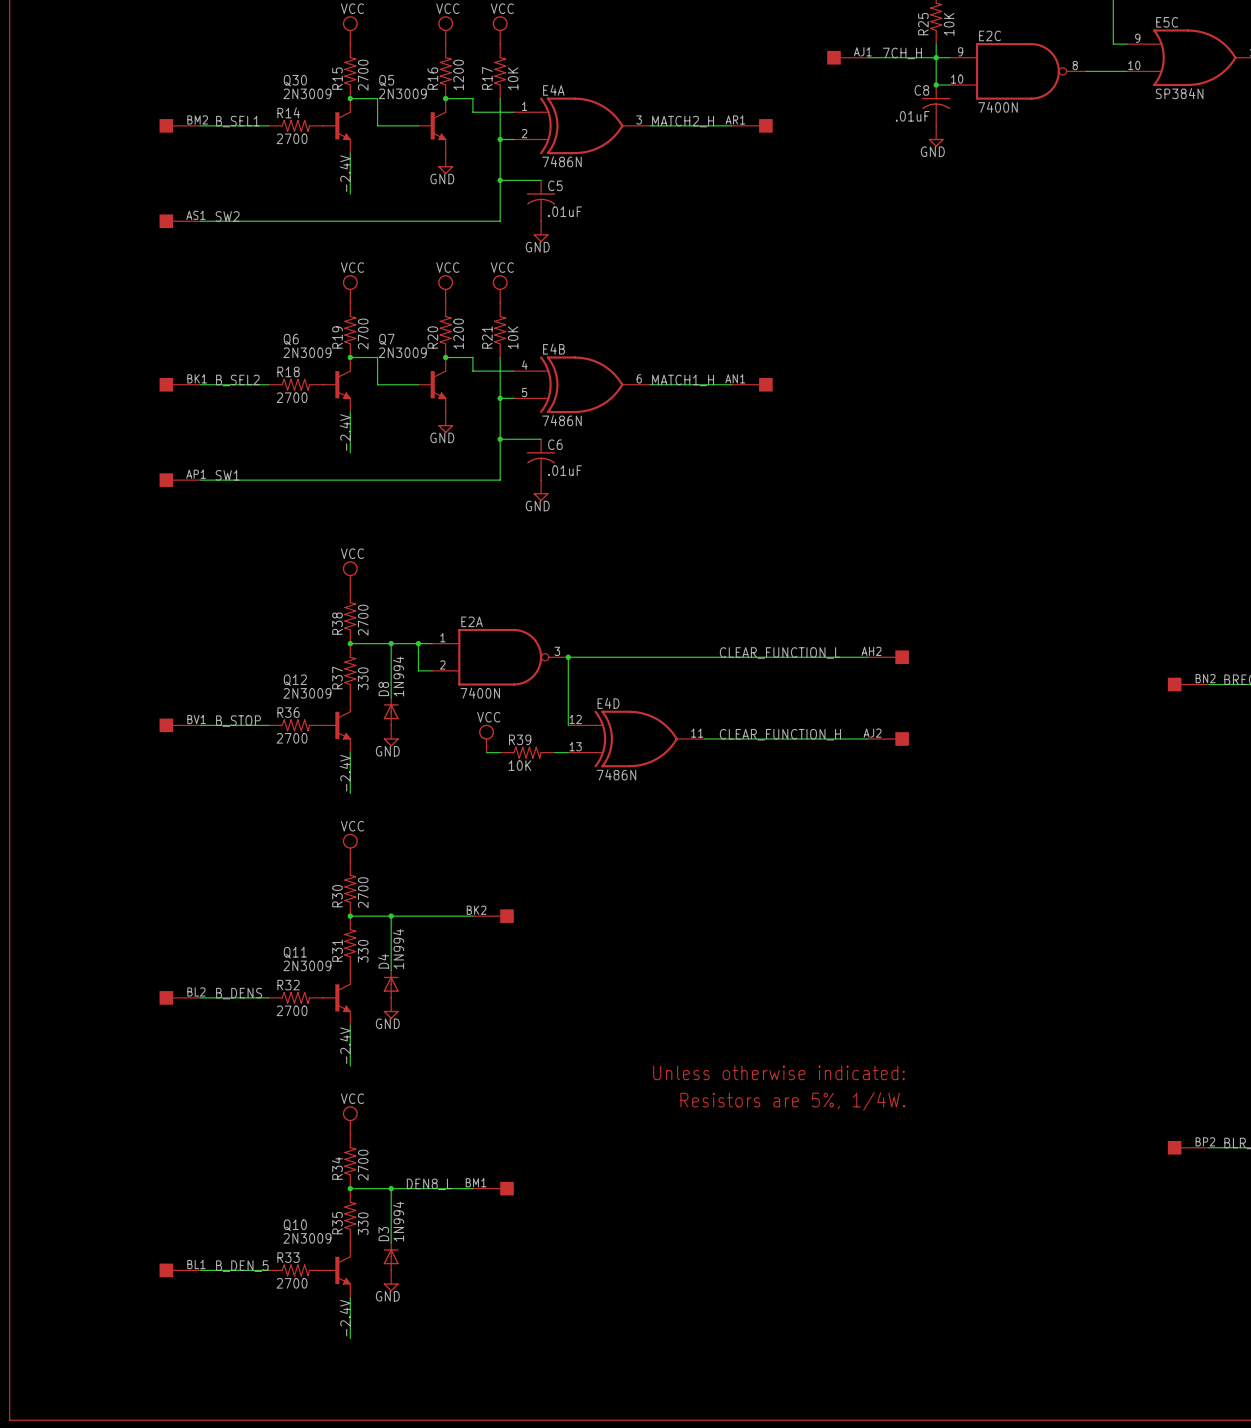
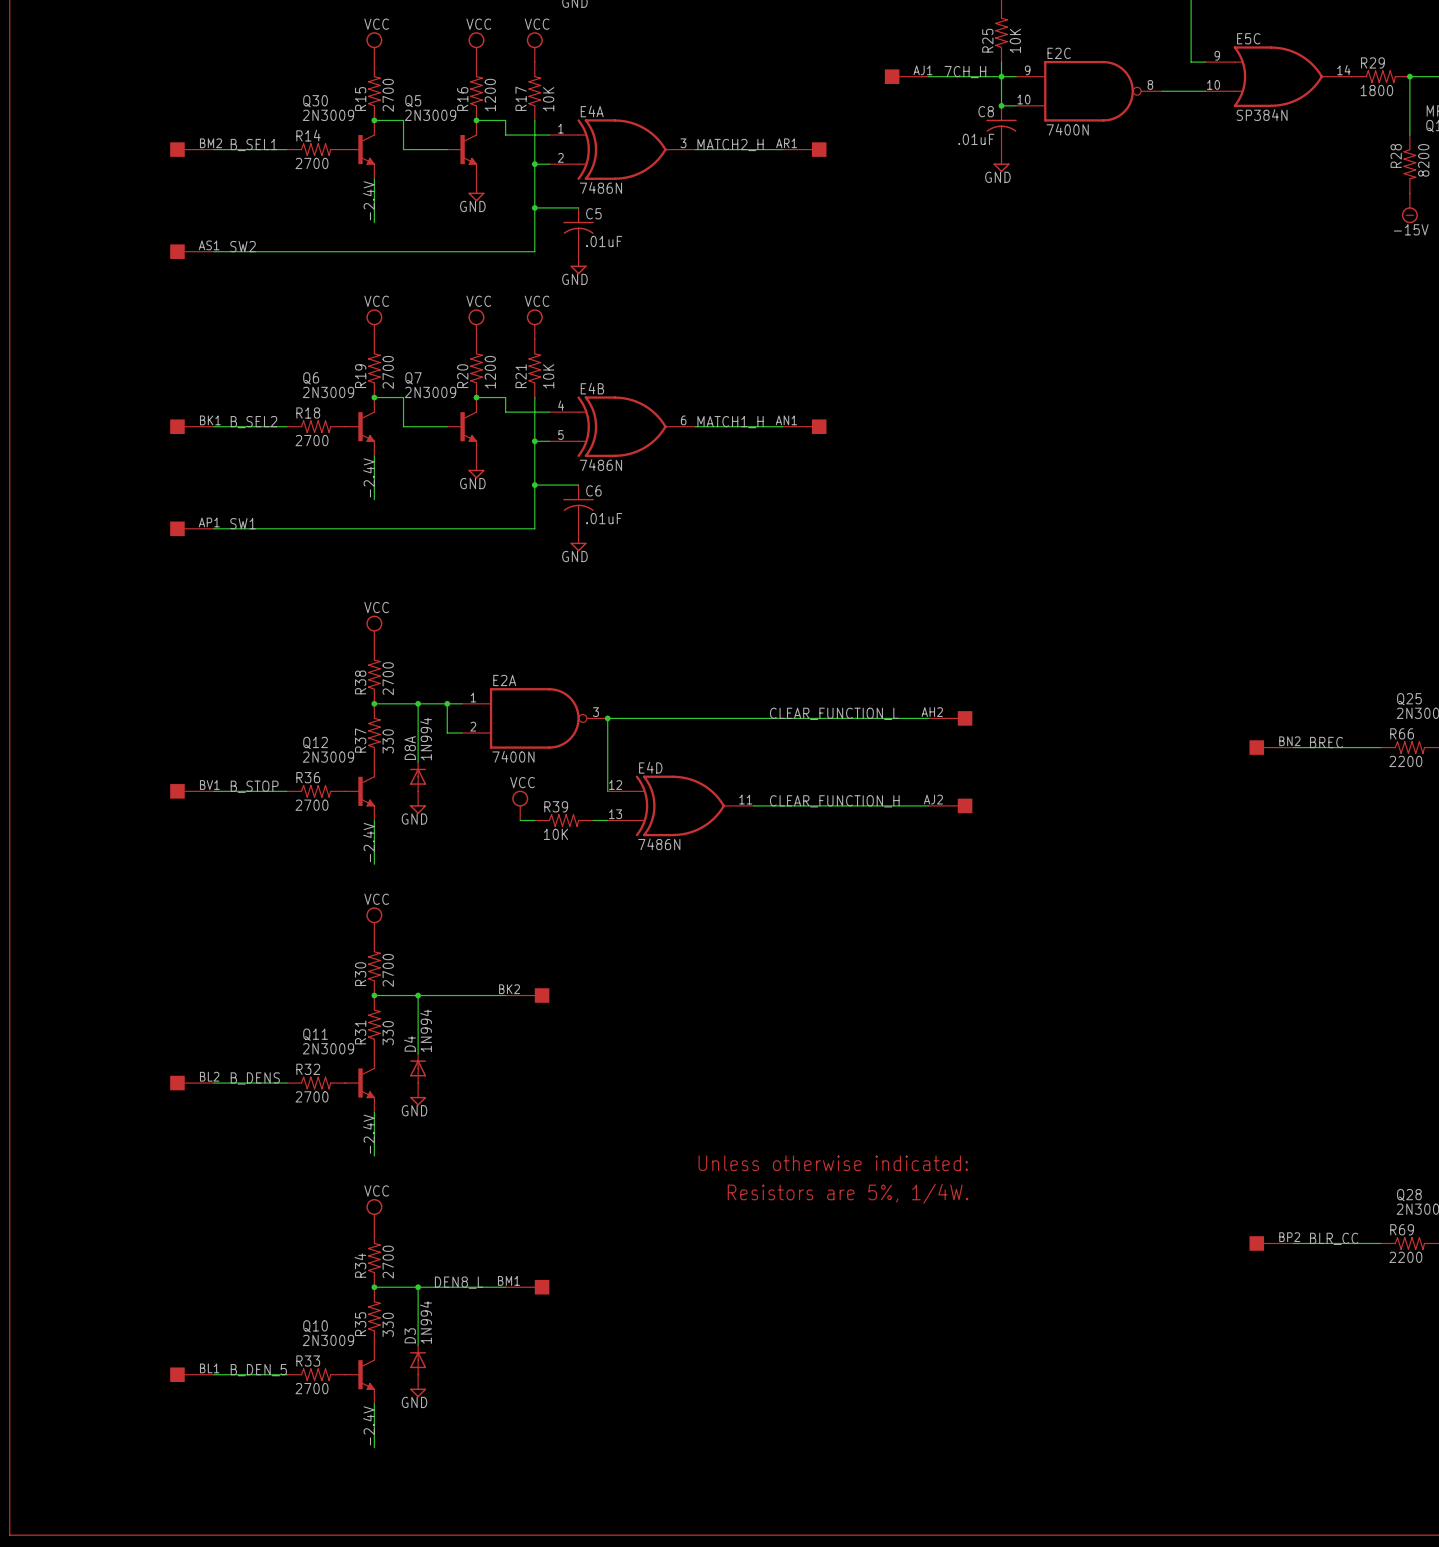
D8 name: D8 (383, 689) -> D8A (410, 748)

